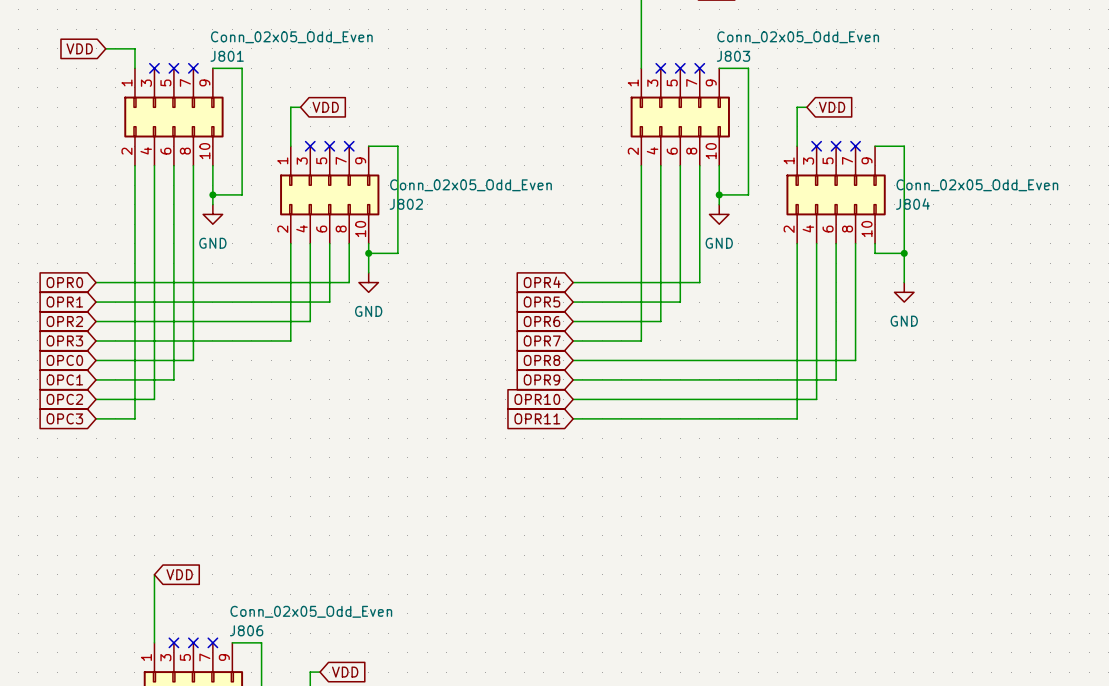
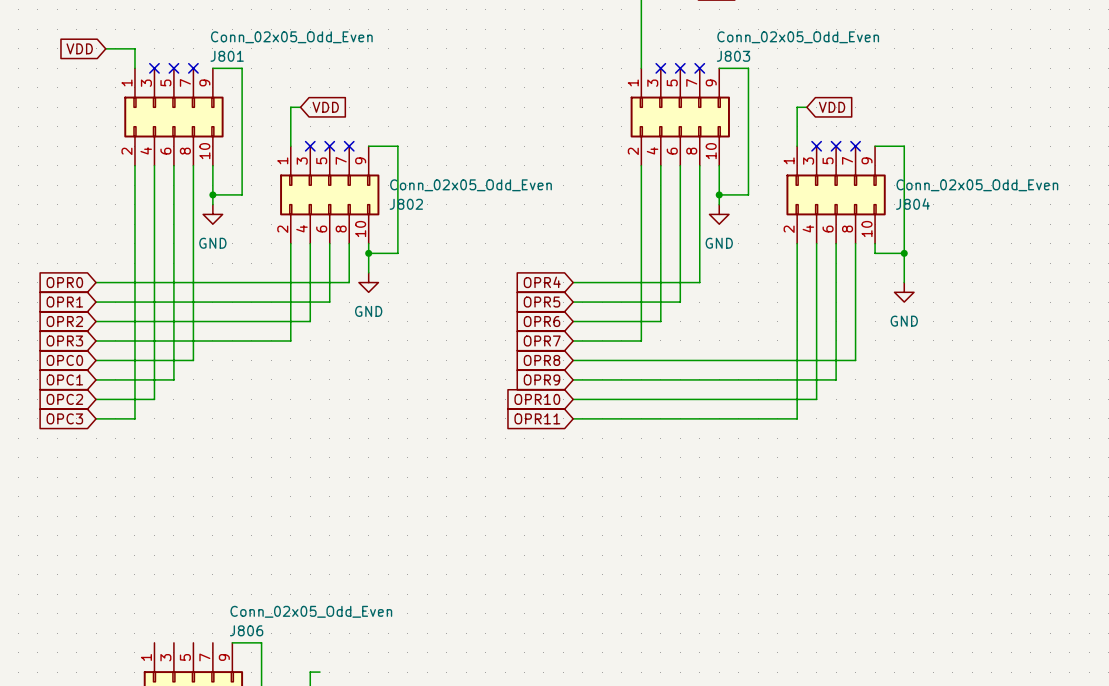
wire: (154, 574) (154, 642) -> none
global label: VDD (179, 574) -> none
no-connect mark: (173, 642) -> none
no-connect mark: (193, 642) -> none
no-connect mark: (212, 642) -> none
global label: VDD (345, 672) -> none

